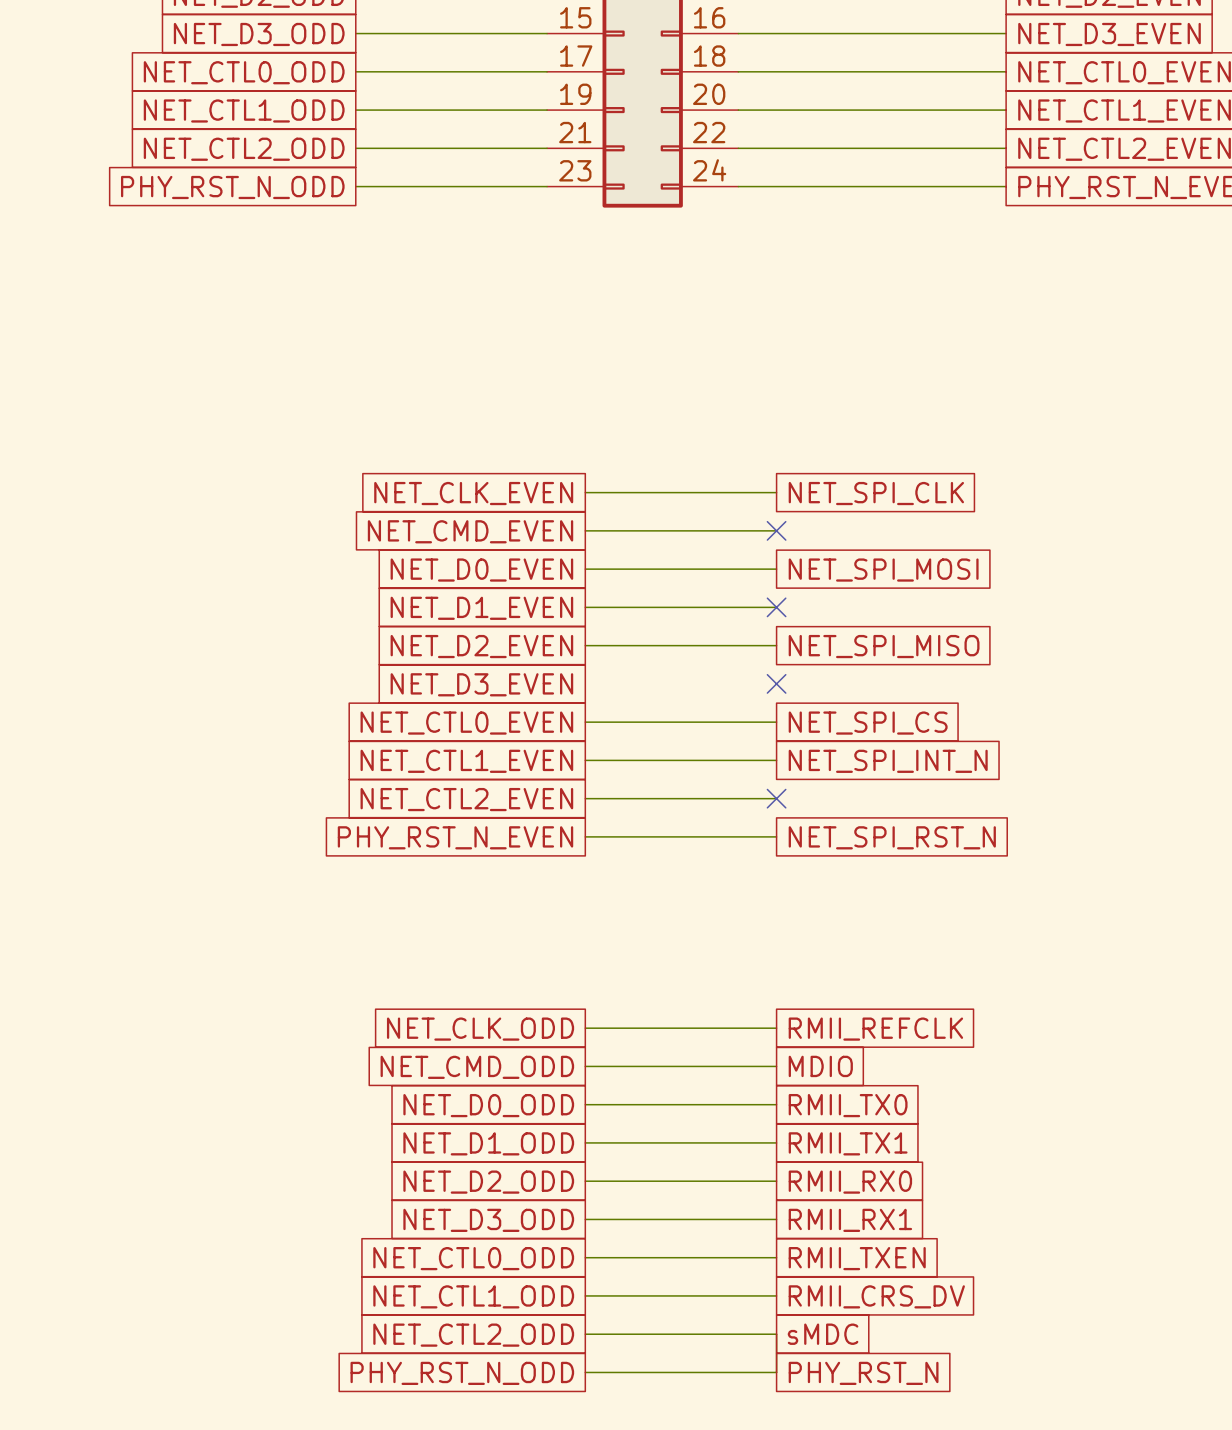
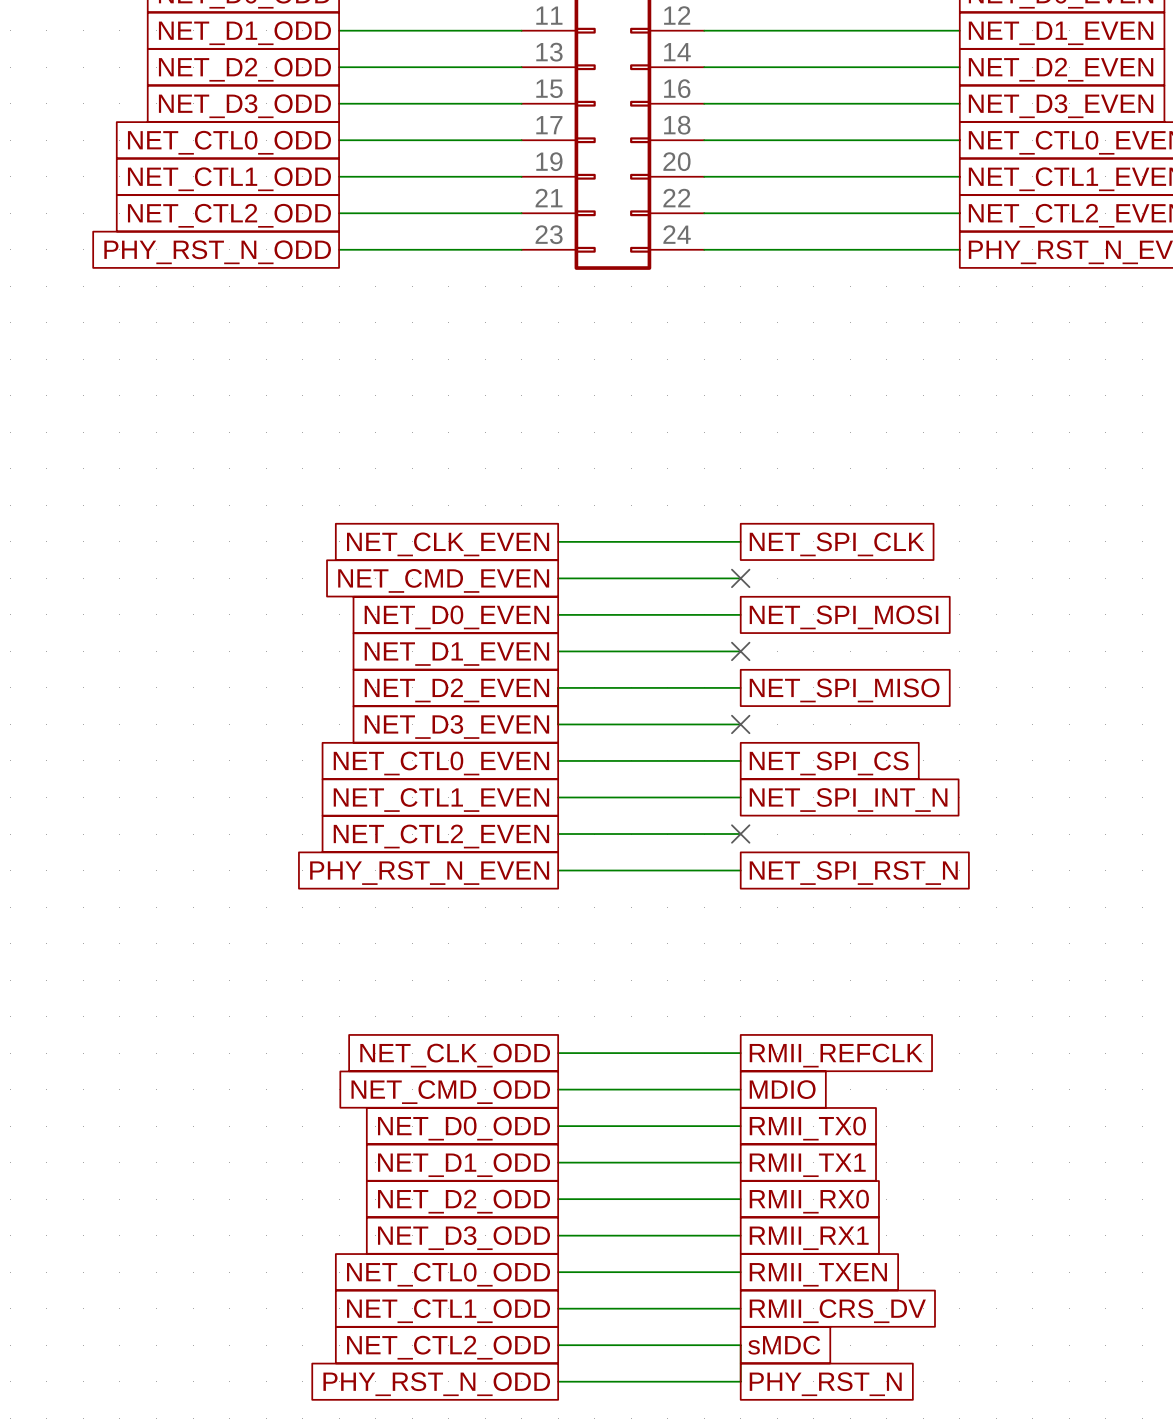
wire: none -> (558, 687) (558, 724) (740, 724)

